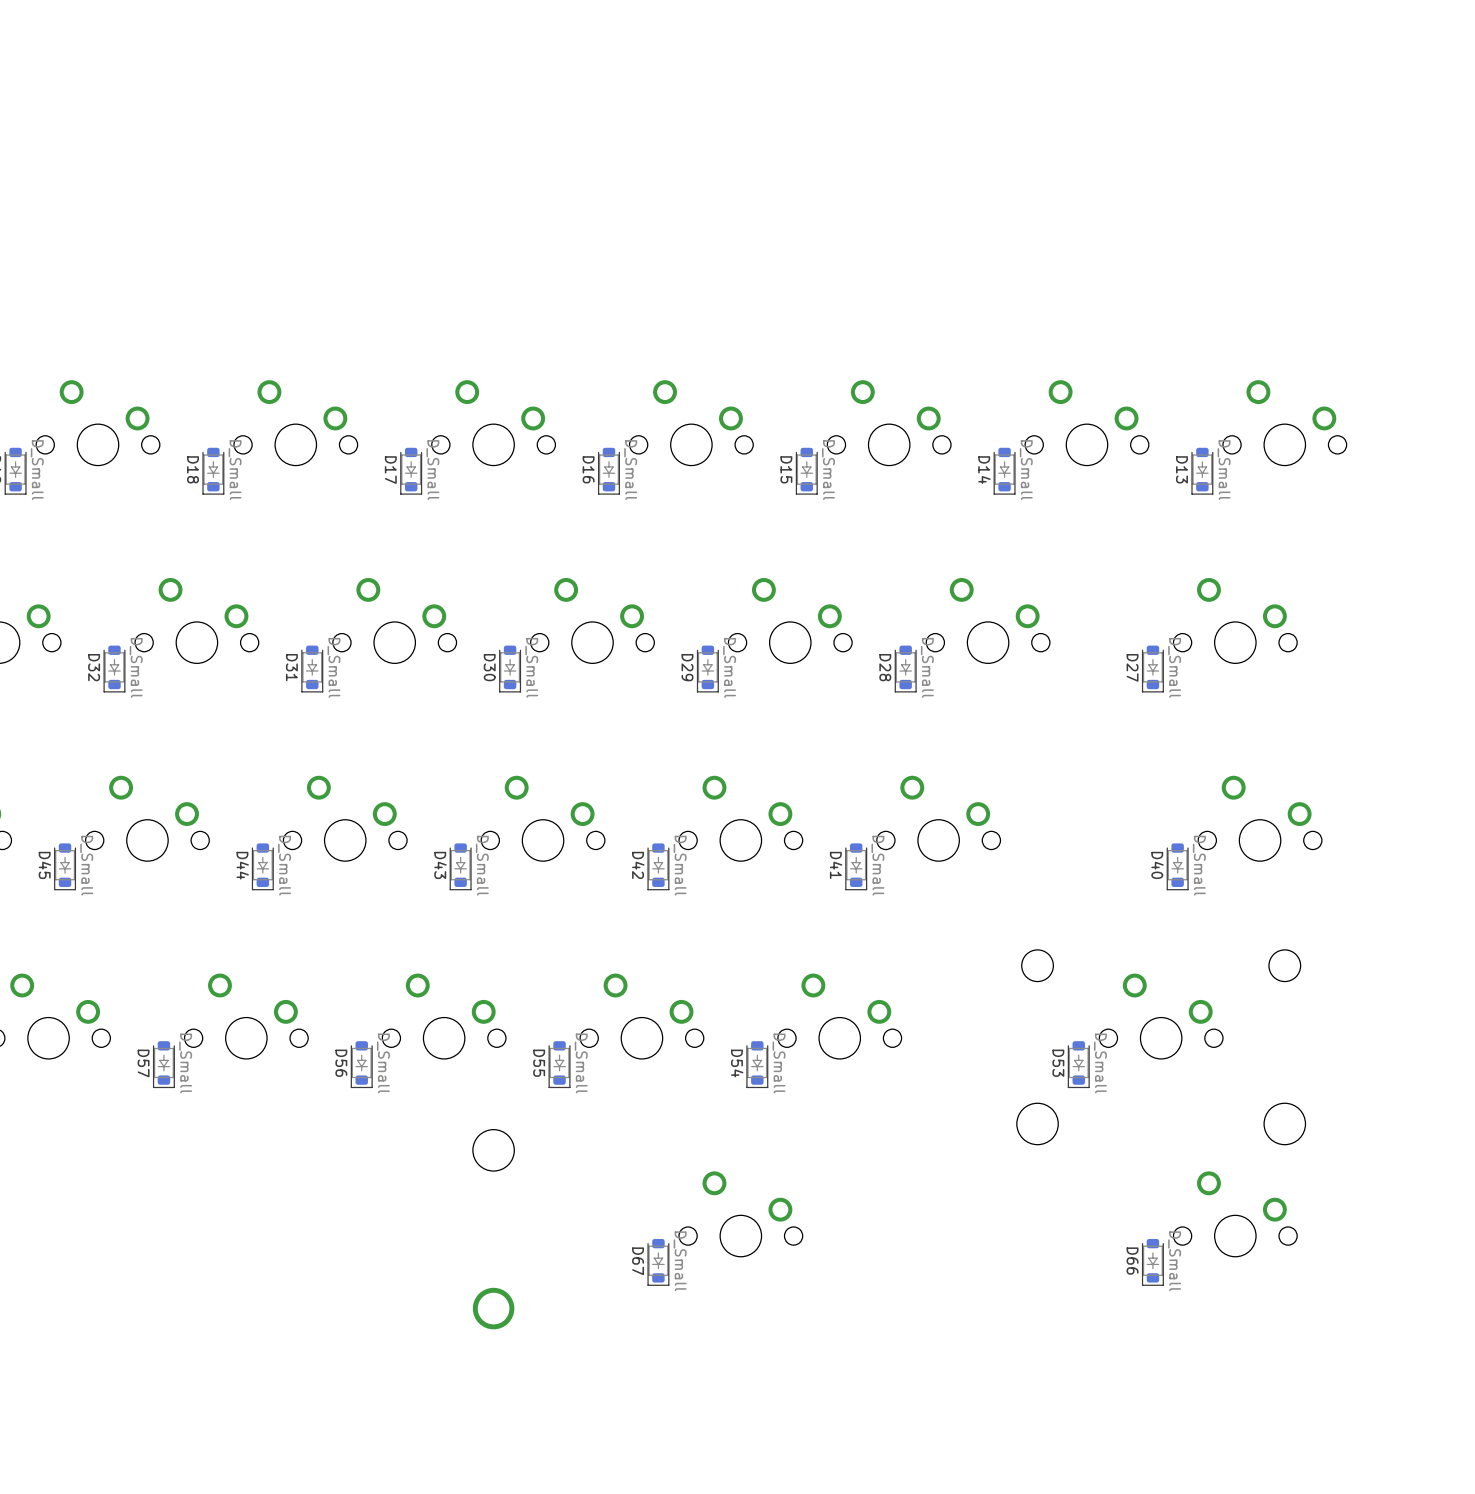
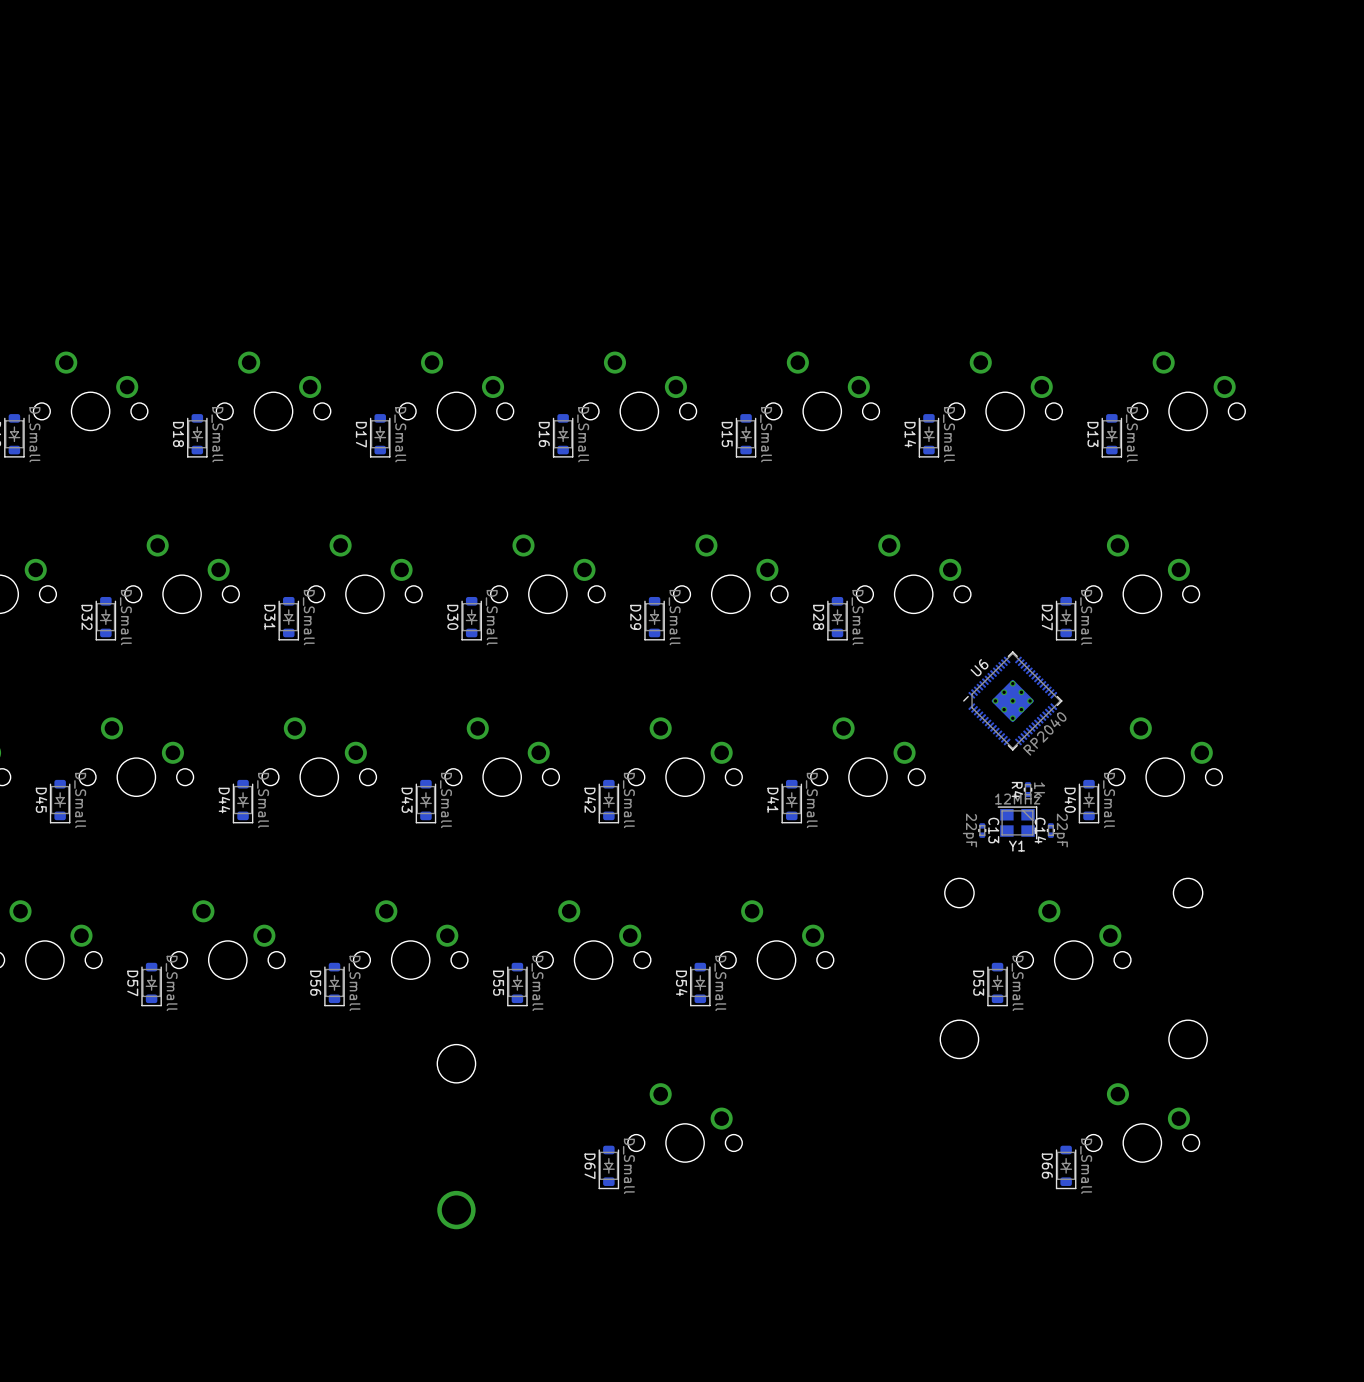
U6: none -> RP2040 (1012, 700)
R4: none -> 1k (1028, 789)
Y1: none -> 12MHz (1017, 822)
C13: none -> 22pF (982, 830)
C14: none -> 22pF (1050, 830)

